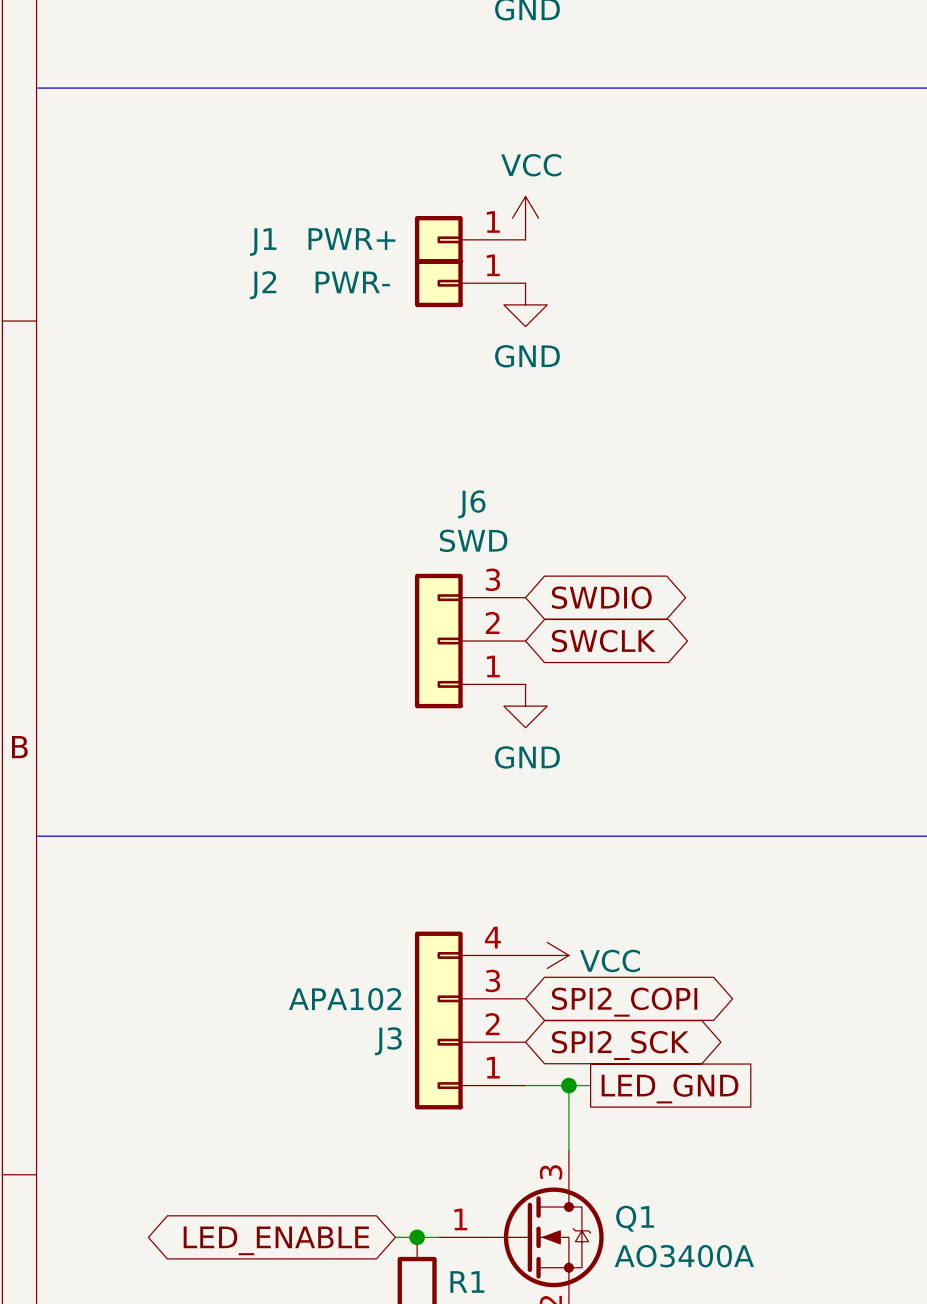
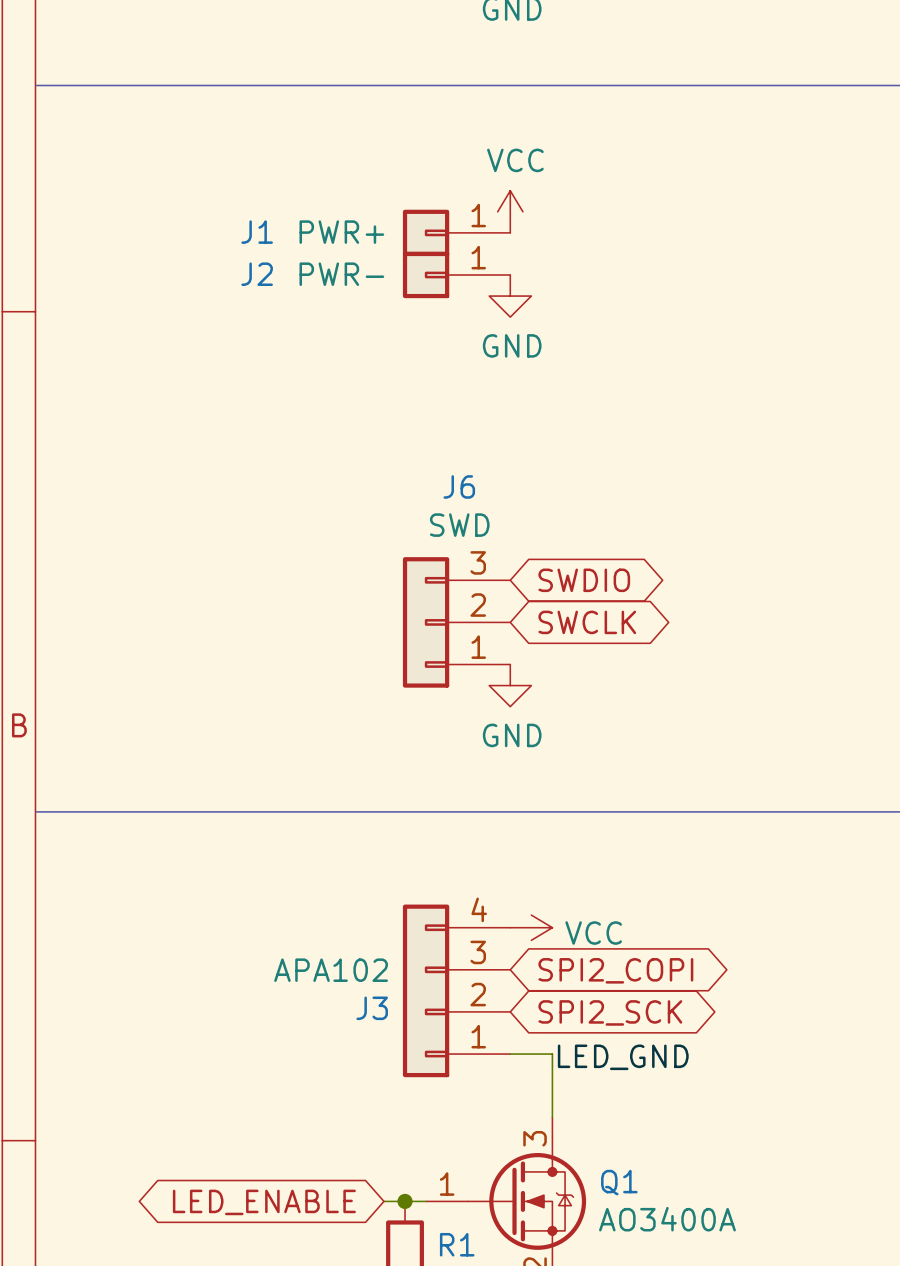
wire: (568, 1085) (590, 1085) -> none
junction: (568, 1085) -> none
global label: LED_GND (670, 1088) -> none
label: none -> LED_GND (623, 1057)

